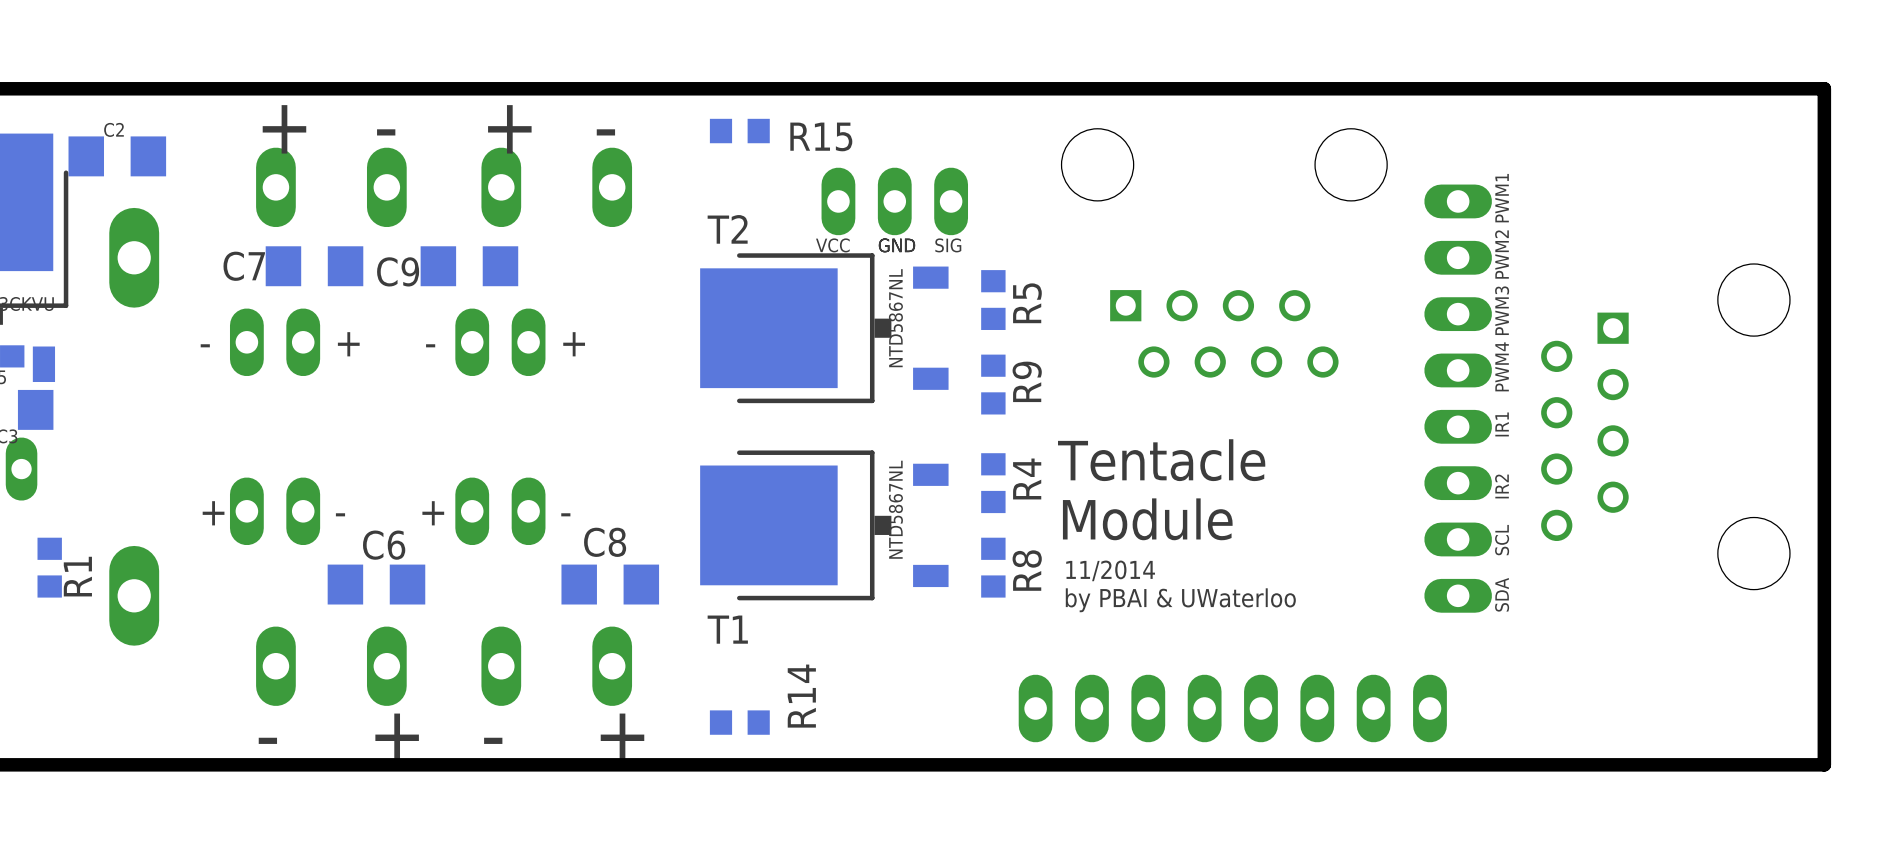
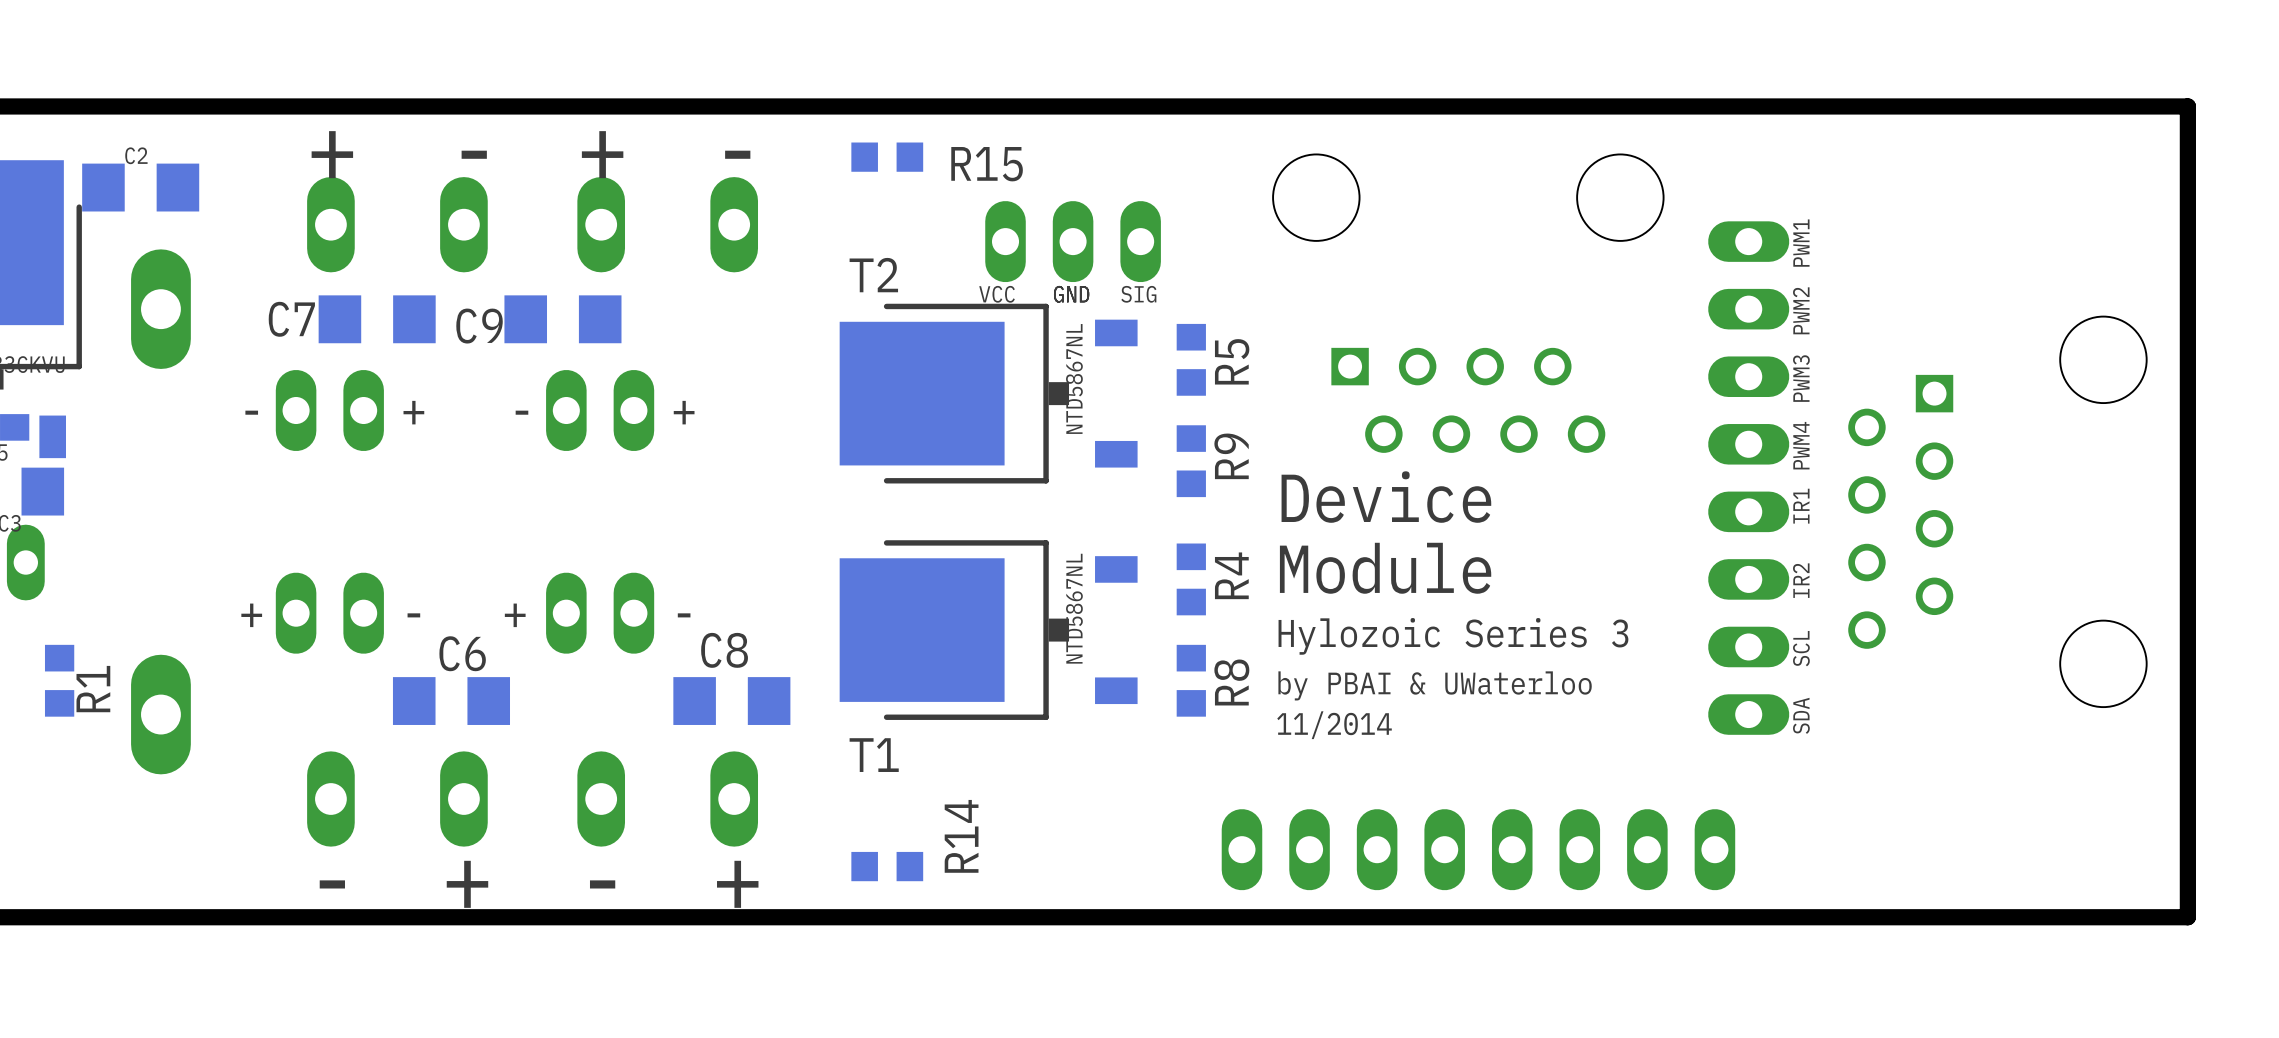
text: none -> Device (1386, 497)
text: Tentacle (1161, 460) -> none
text position: Module (1147, 519) -> Module (1385, 568)
text: none -> Hylozoic Series 3 (1453, 636)
text: 11/2014 (1110, 570) -> by PBAI & UWaterloo (1435, 685)
text: by PBAI & UWaterloo (1180, 600) -> 11/2014 (1334, 725)

